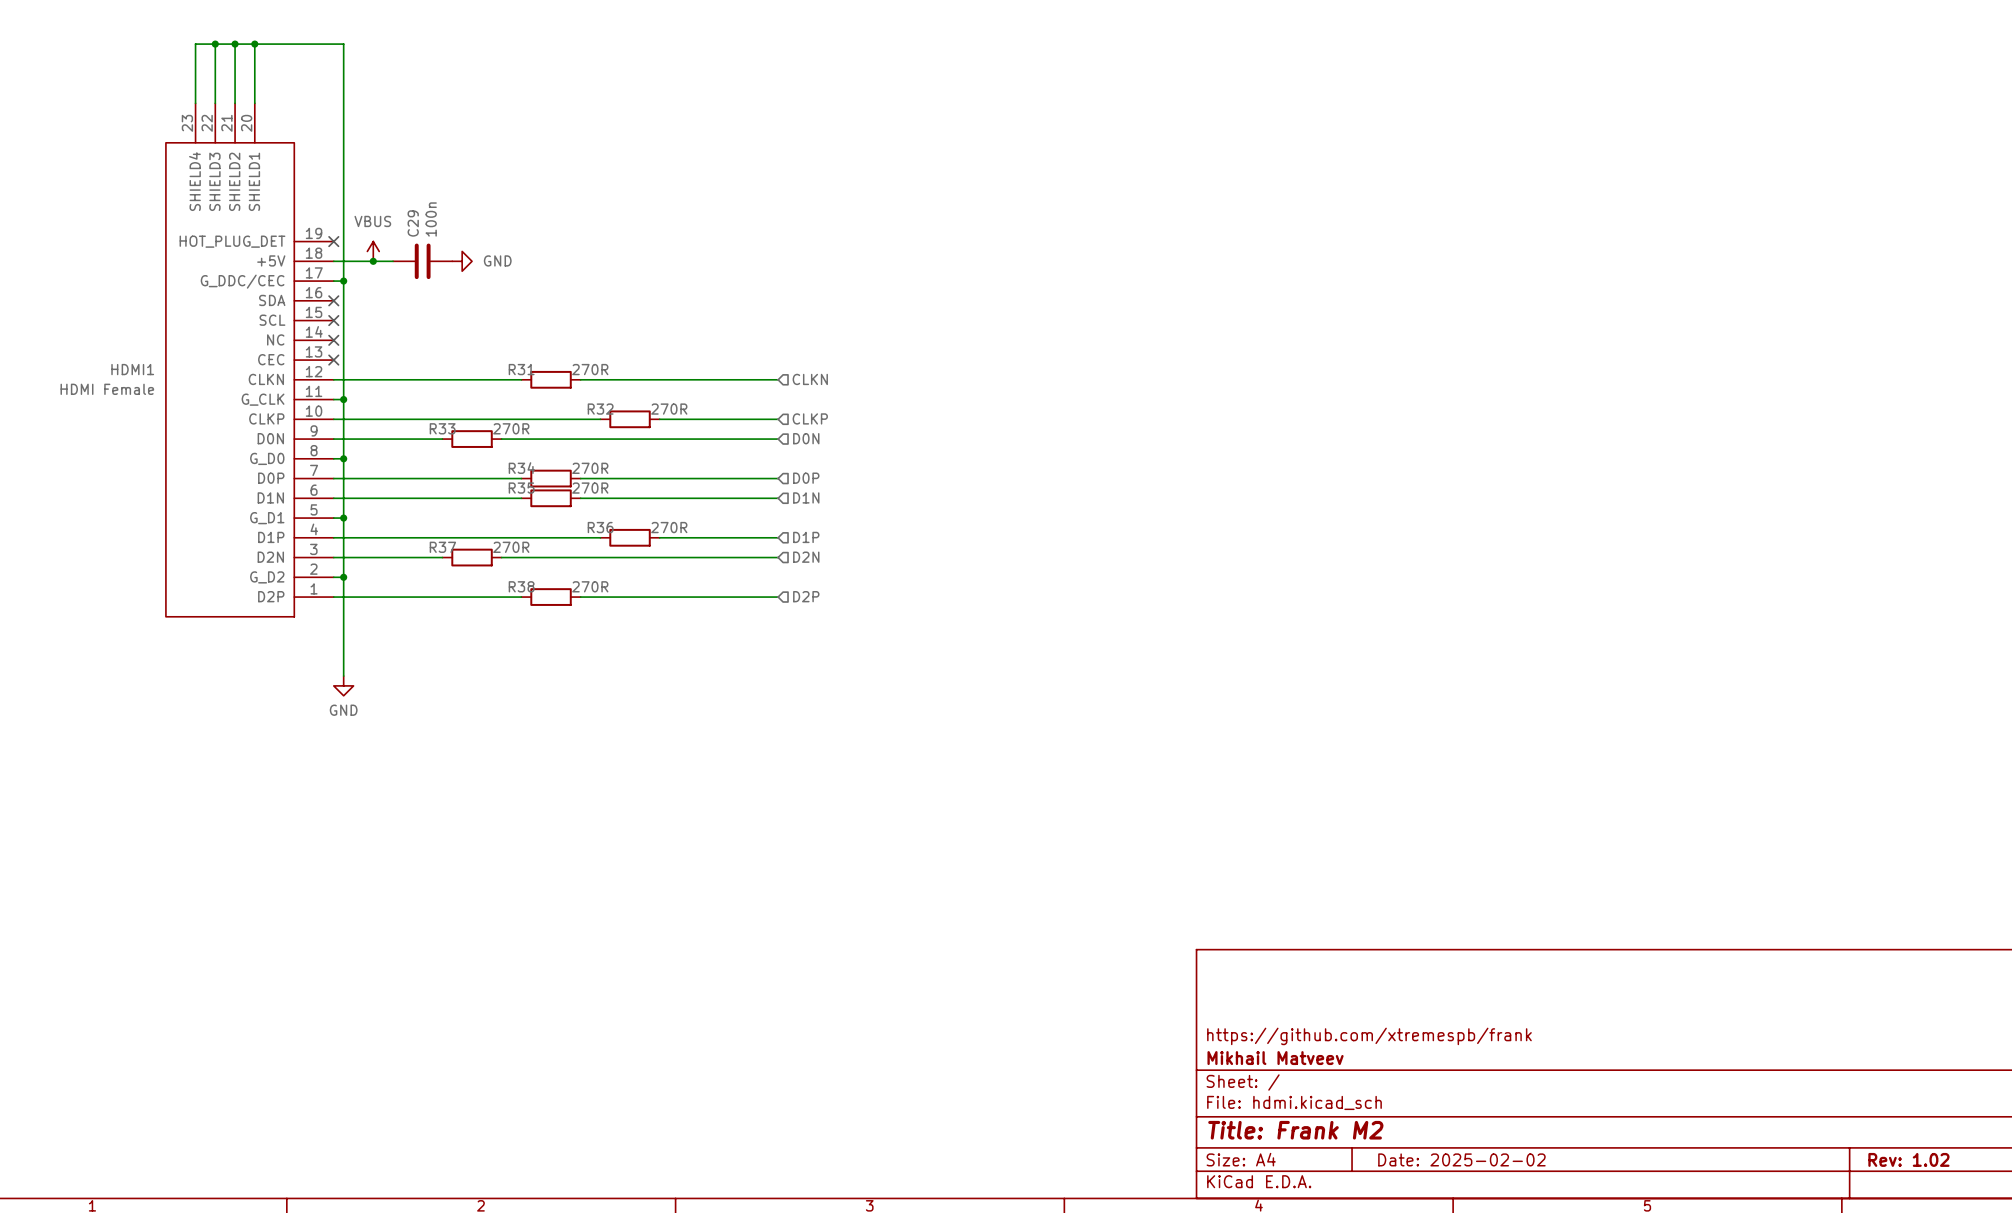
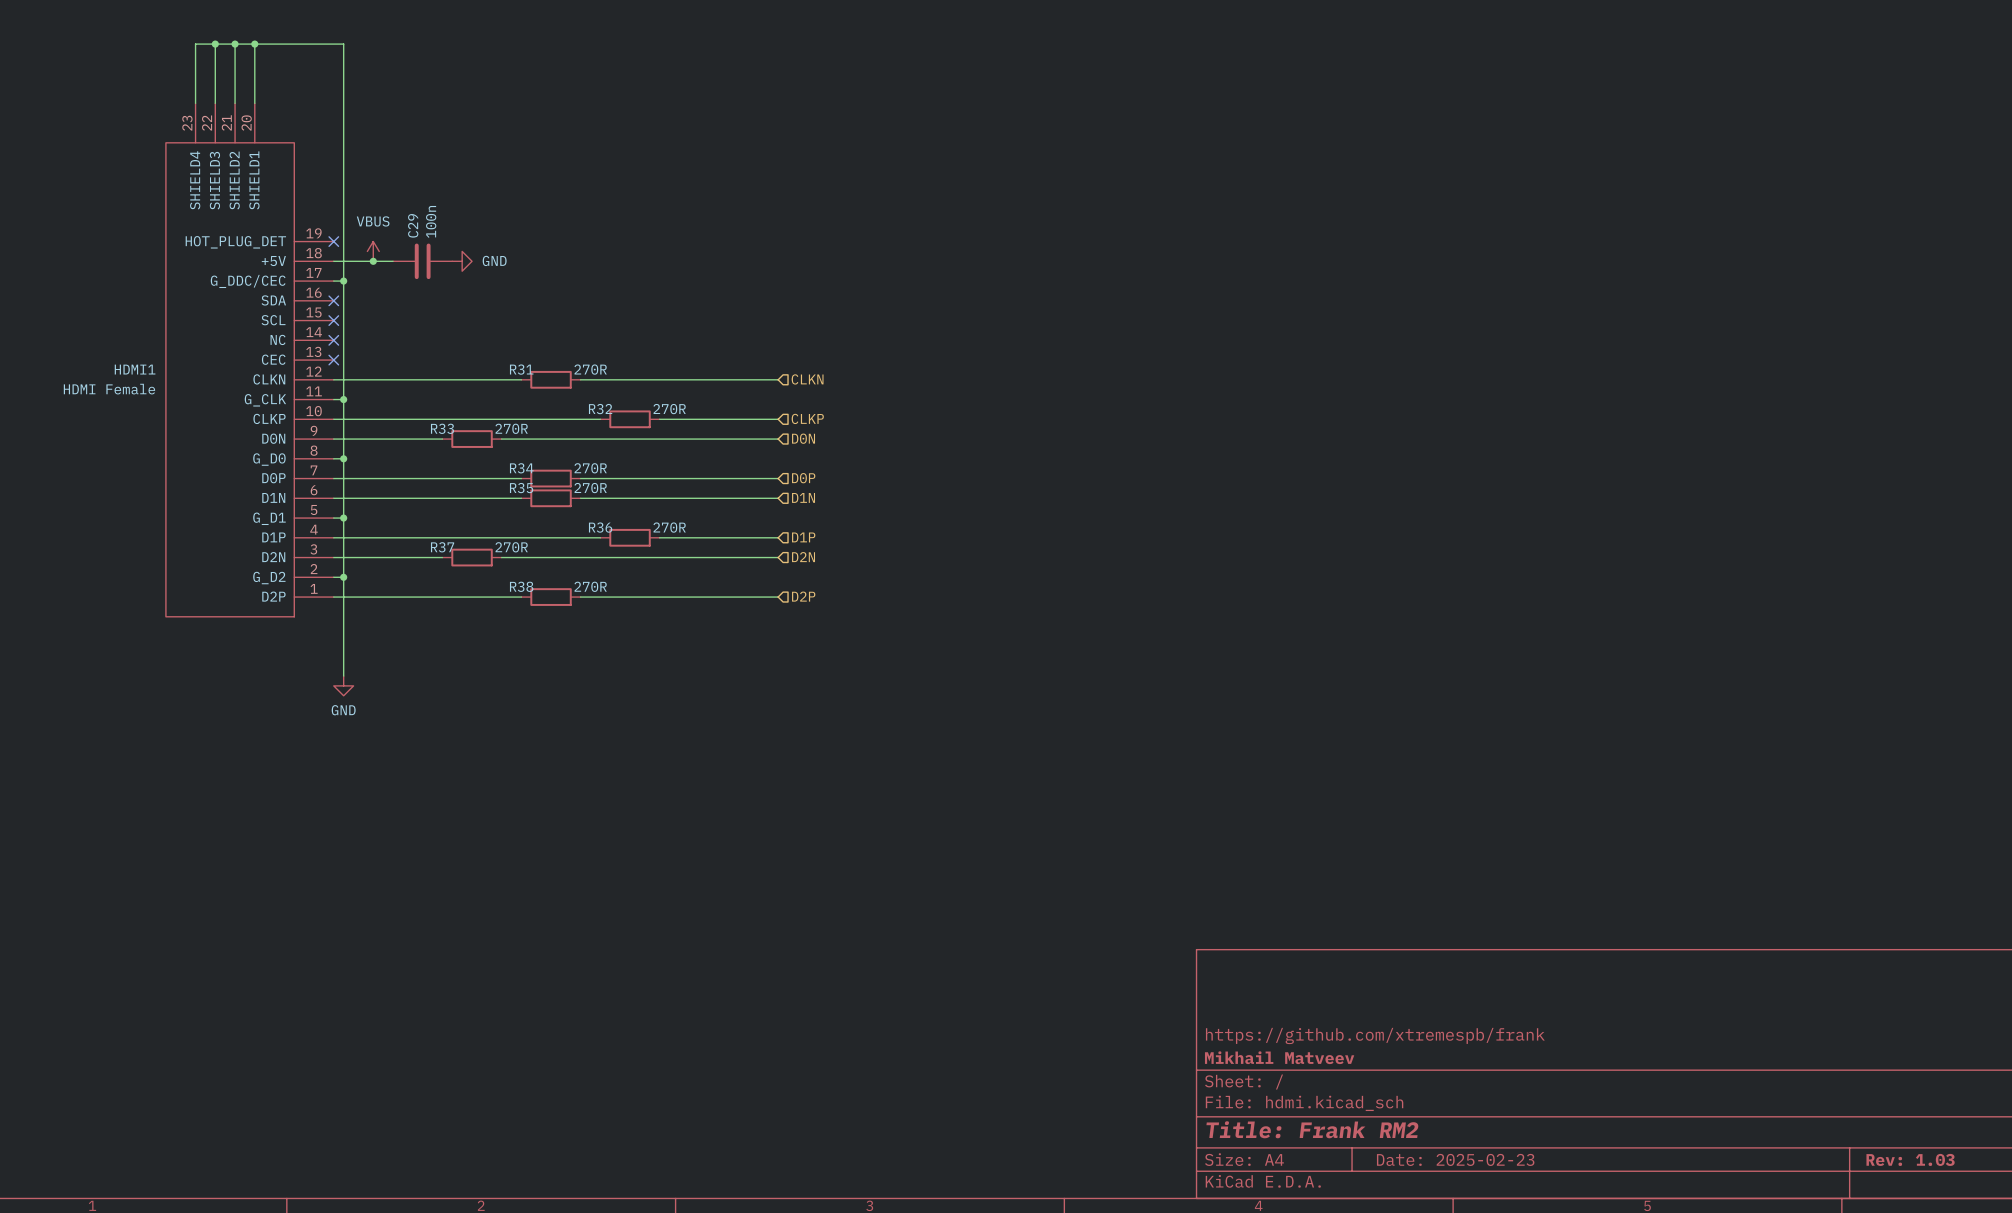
title block: Title: Frank M2 (1295, 1130) -> Title: Frank RM2 (1312, 1129)
title block: Date: 2025-02-02 (1461, 1159) -> Date: 2025-02-23 (1455, 1159)
title block: Rev: 1.02 (1908, 1159) -> Rev: 1.03 (1910, 1159)

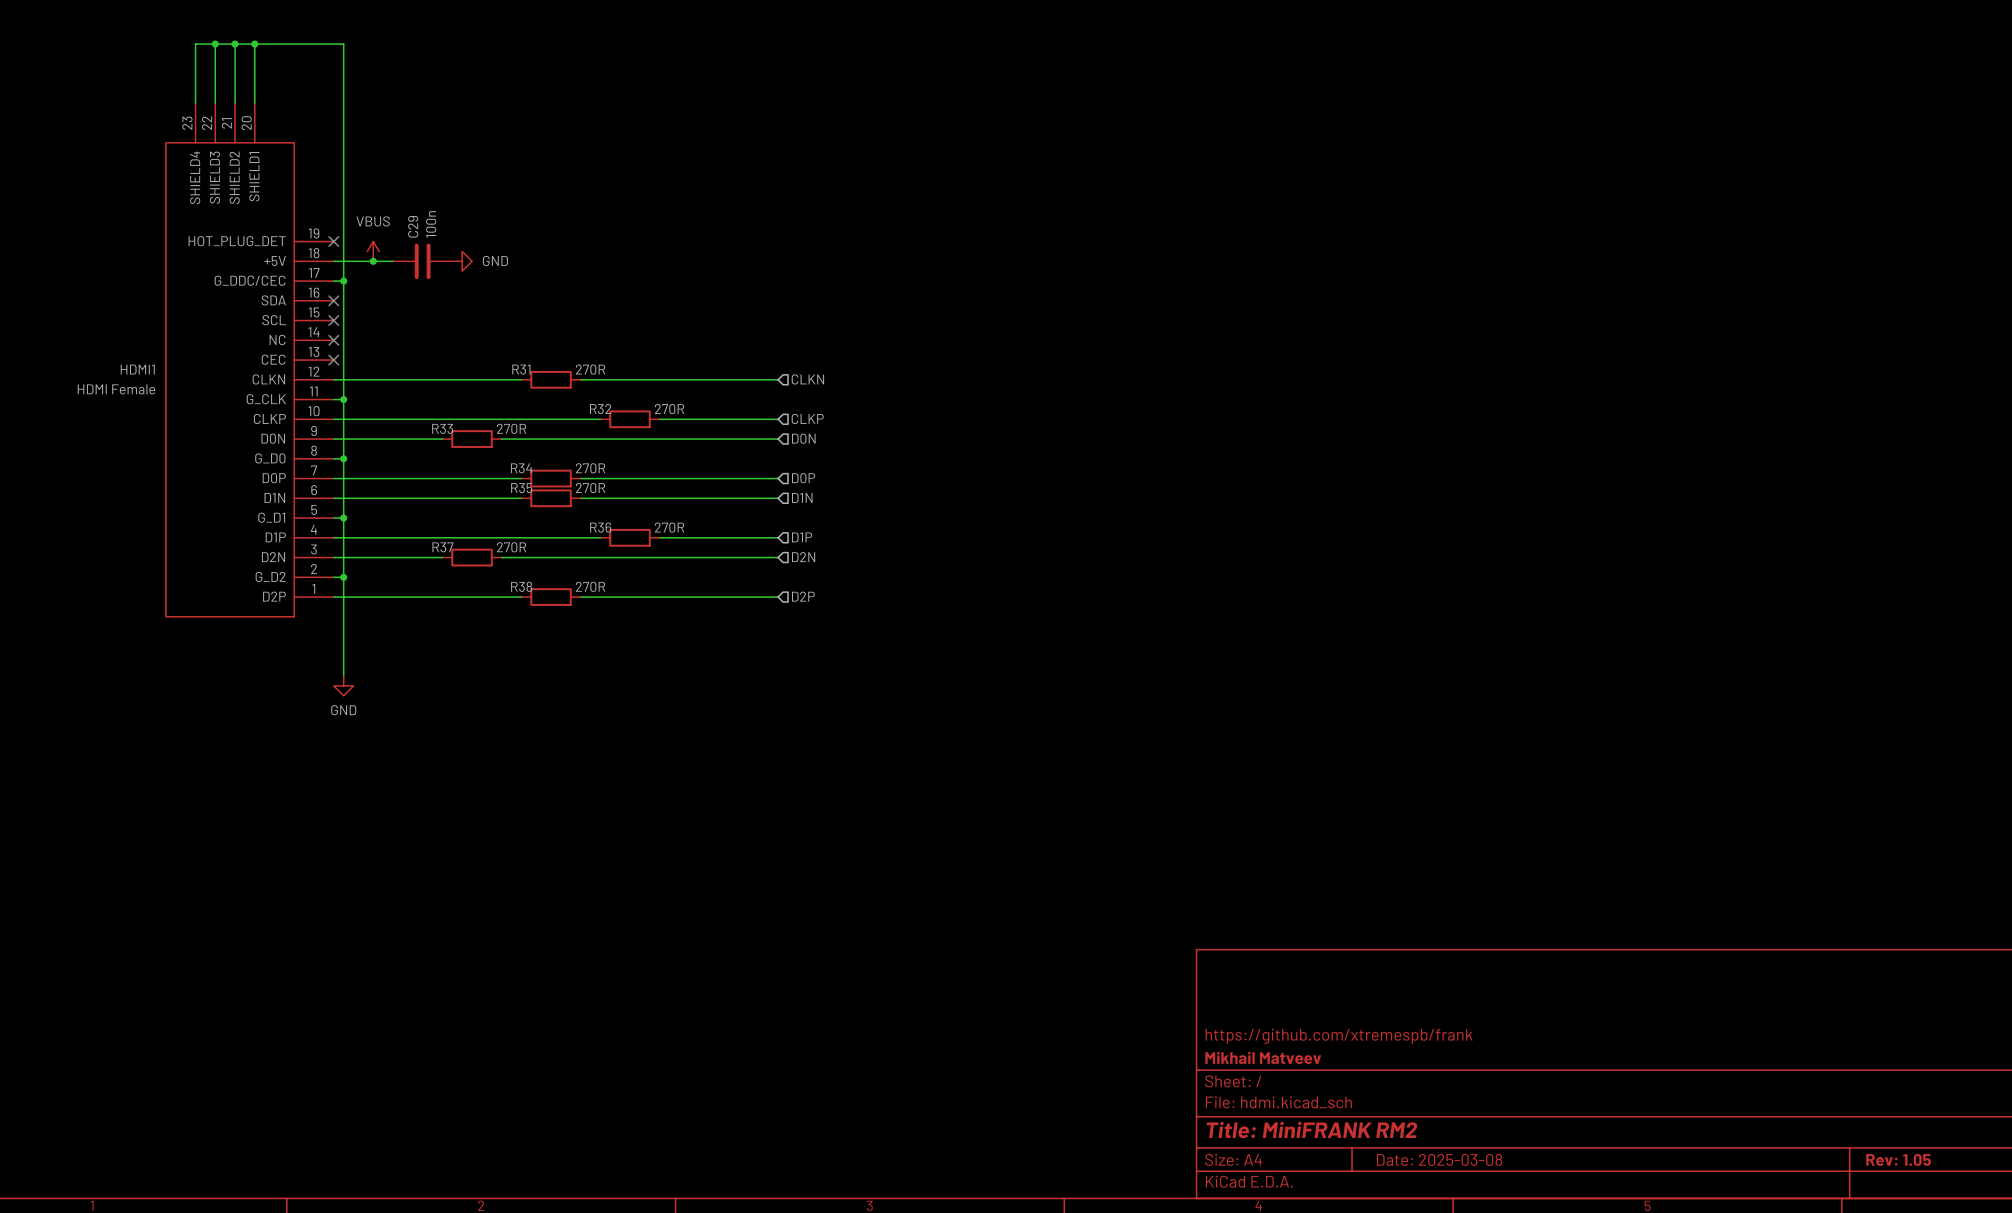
title block: Title: Frank RM2 (1312, 1129) -> Title: MiniFRANK RM2 (1311, 1129)
title block: Date: 2025-02-23 (1455, 1159) -> Date: 2025-03-08 (1439, 1159)
title block: Rev: 1.03 (1910, 1159) -> Rev: 1.05 (1898, 1159)

